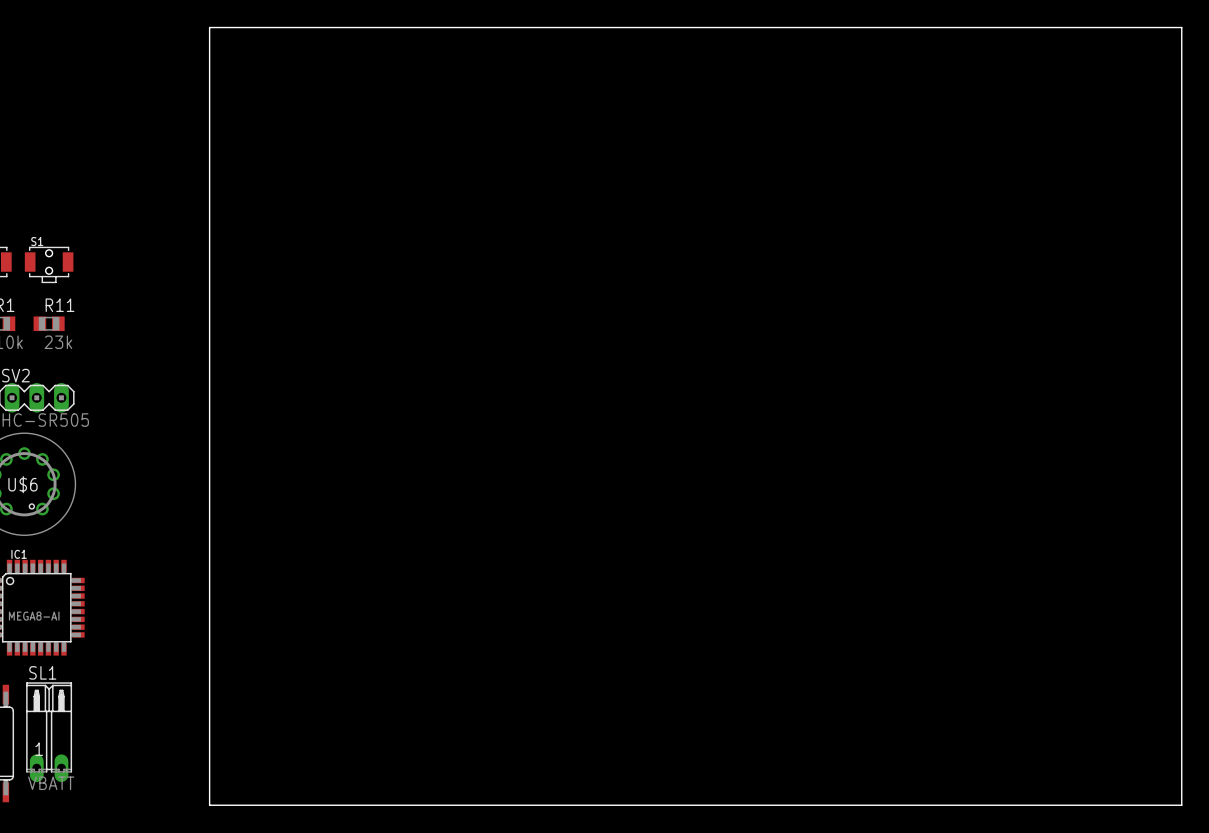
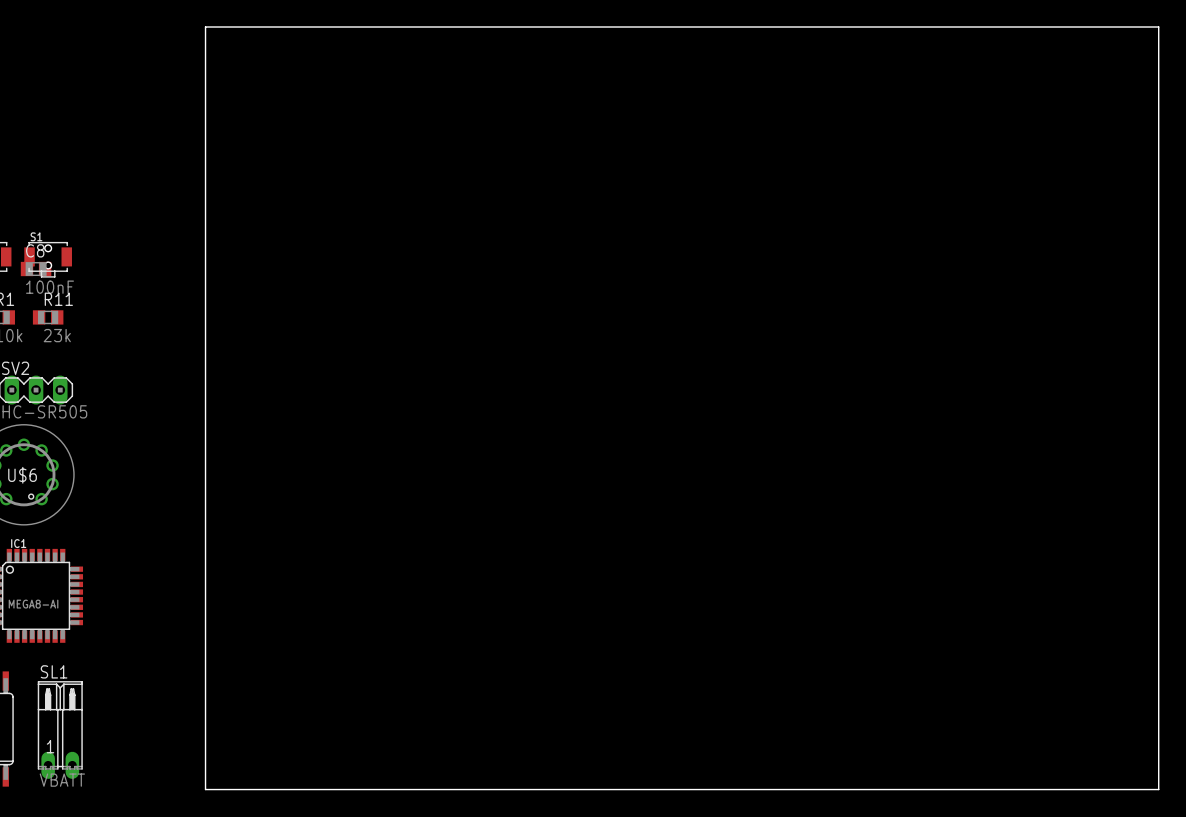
C8: none -> 100nF (36, 269)
SL1 position: (49, 732) -> (60, 729)

